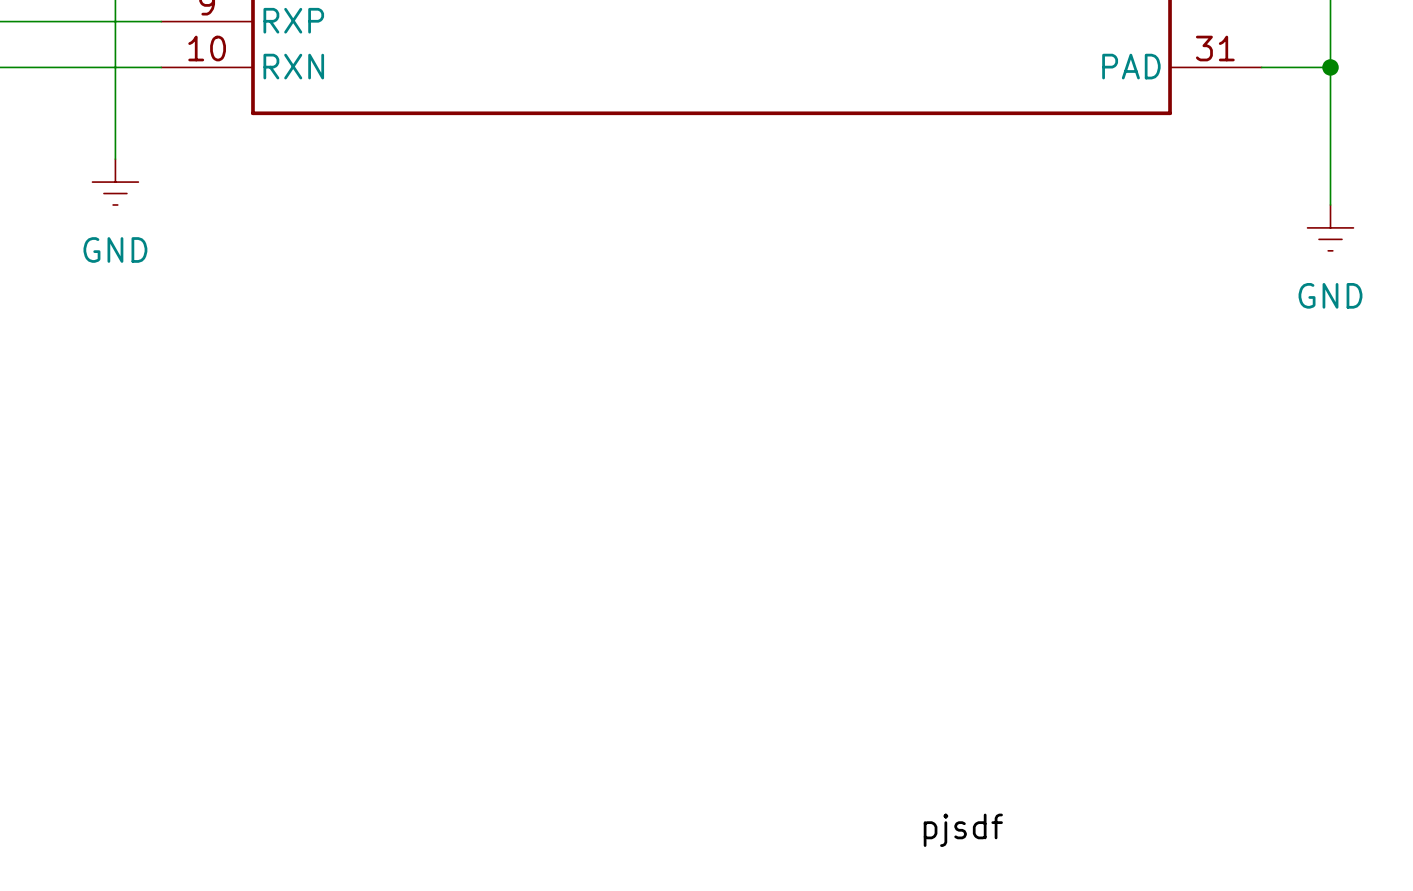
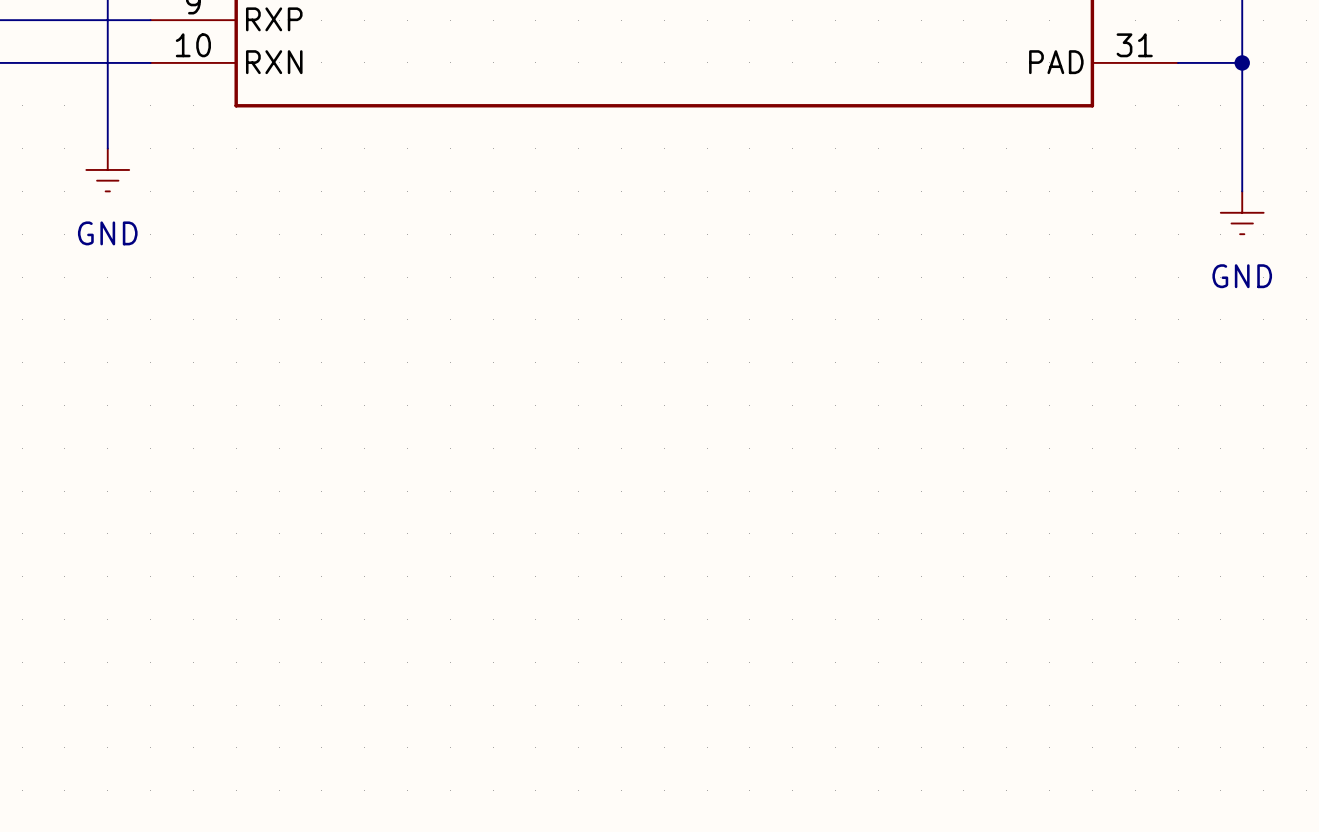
label: pjsdf (963, 830) -> none

